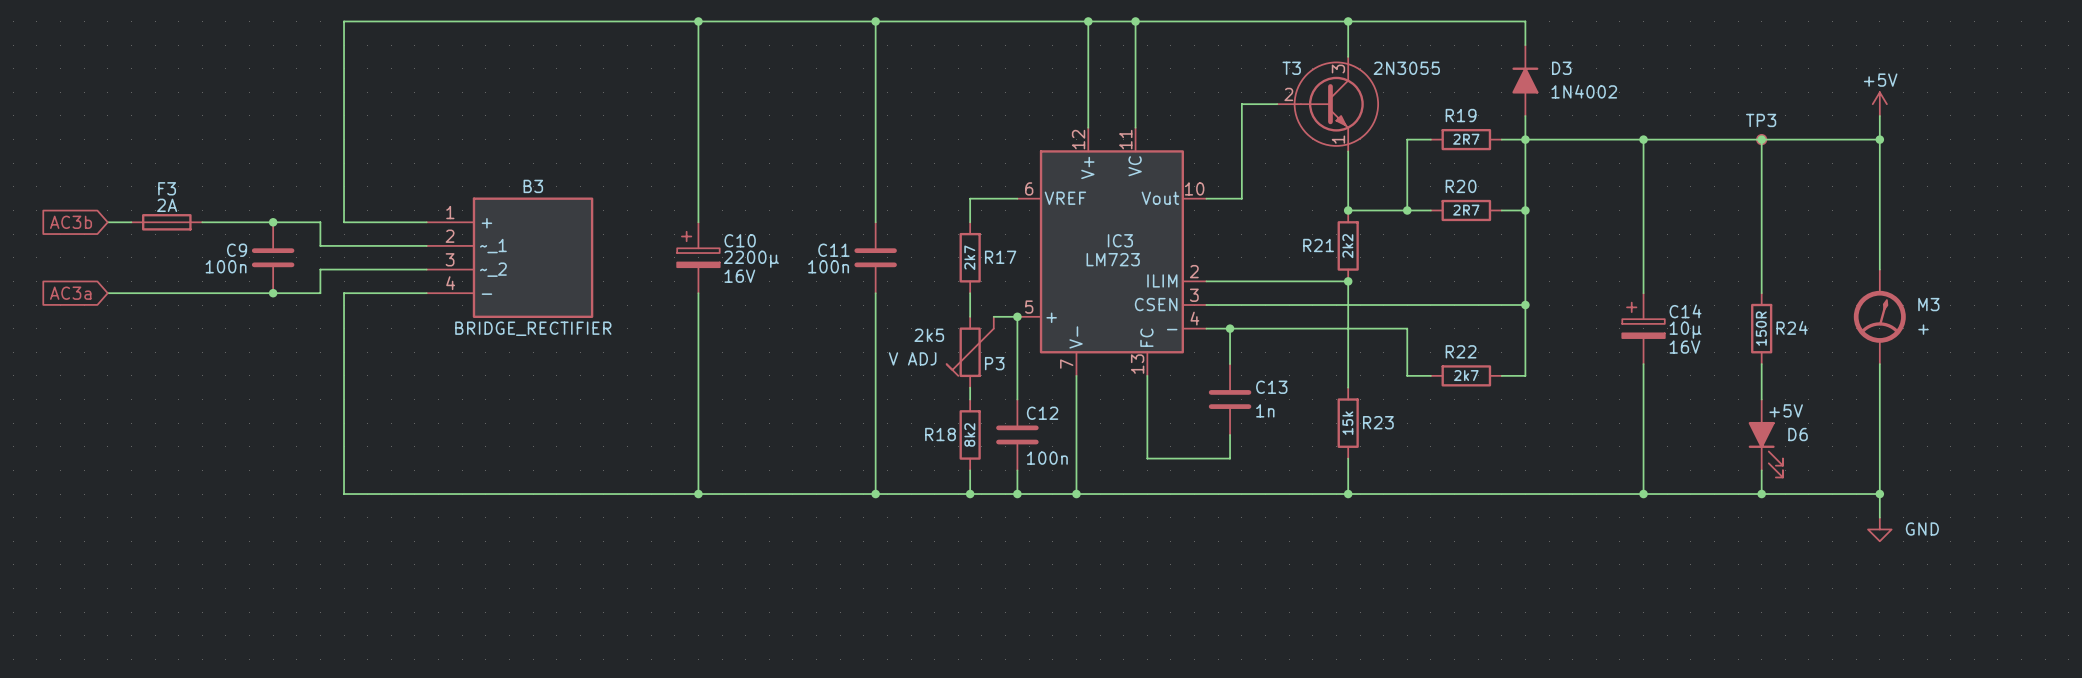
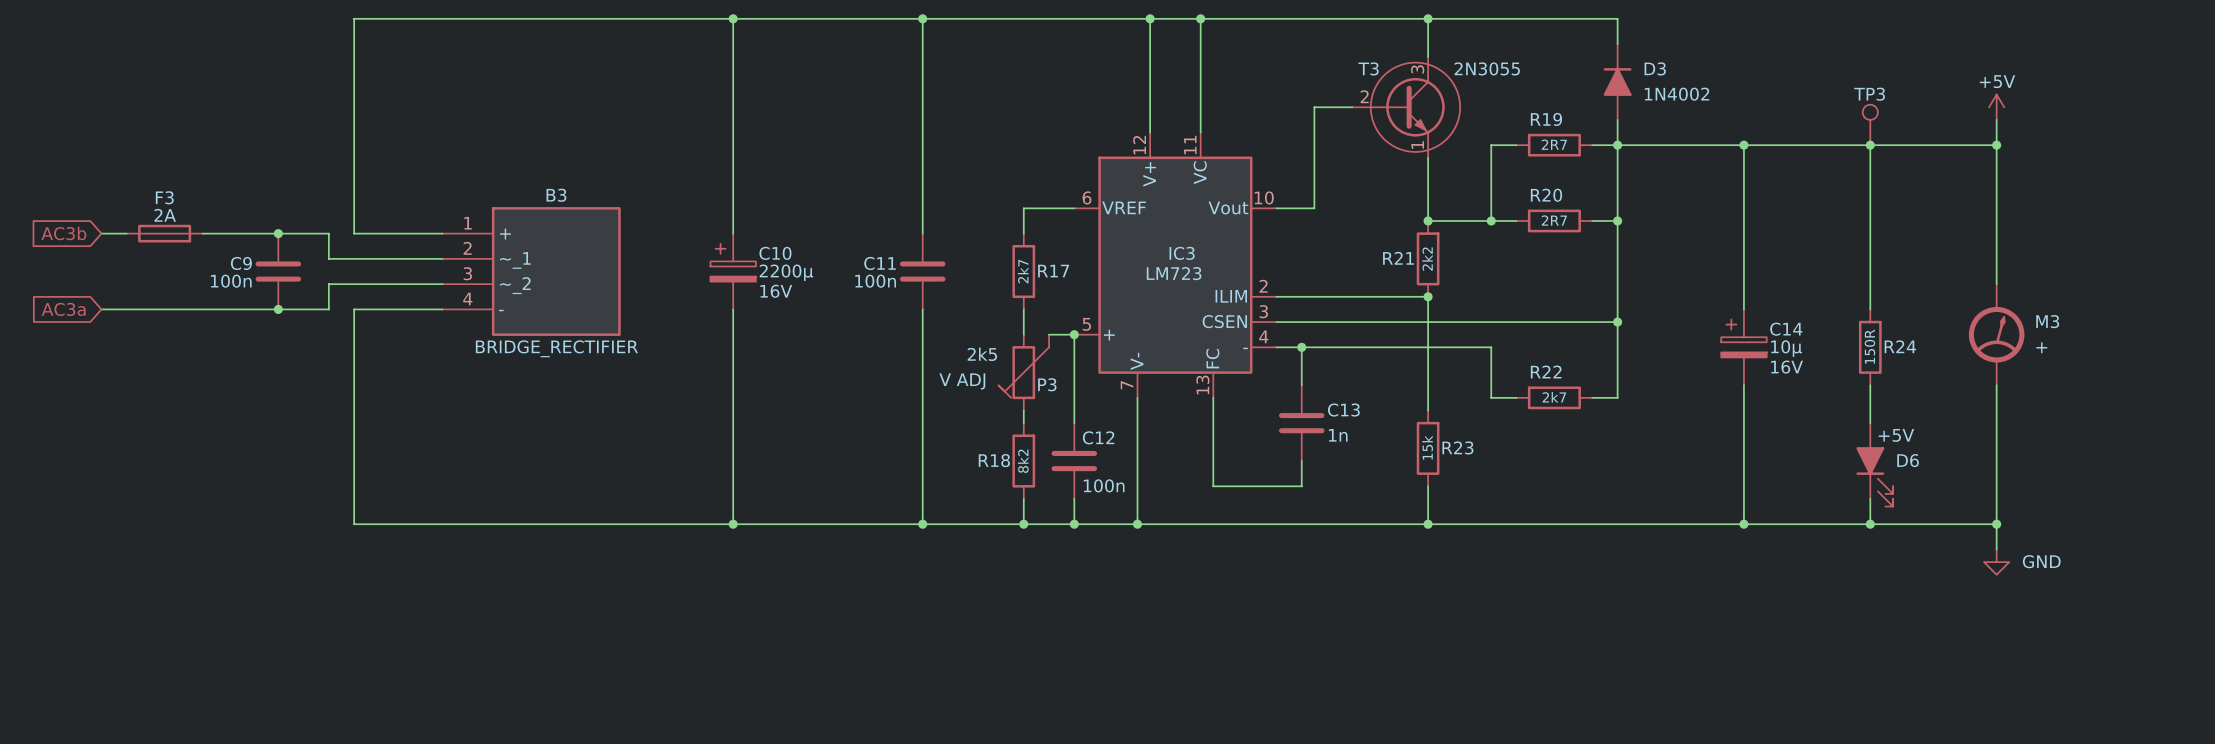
TP3 symbol: [1756, 134, 1767, 145] -> [1862, 104, 1878, 146]

